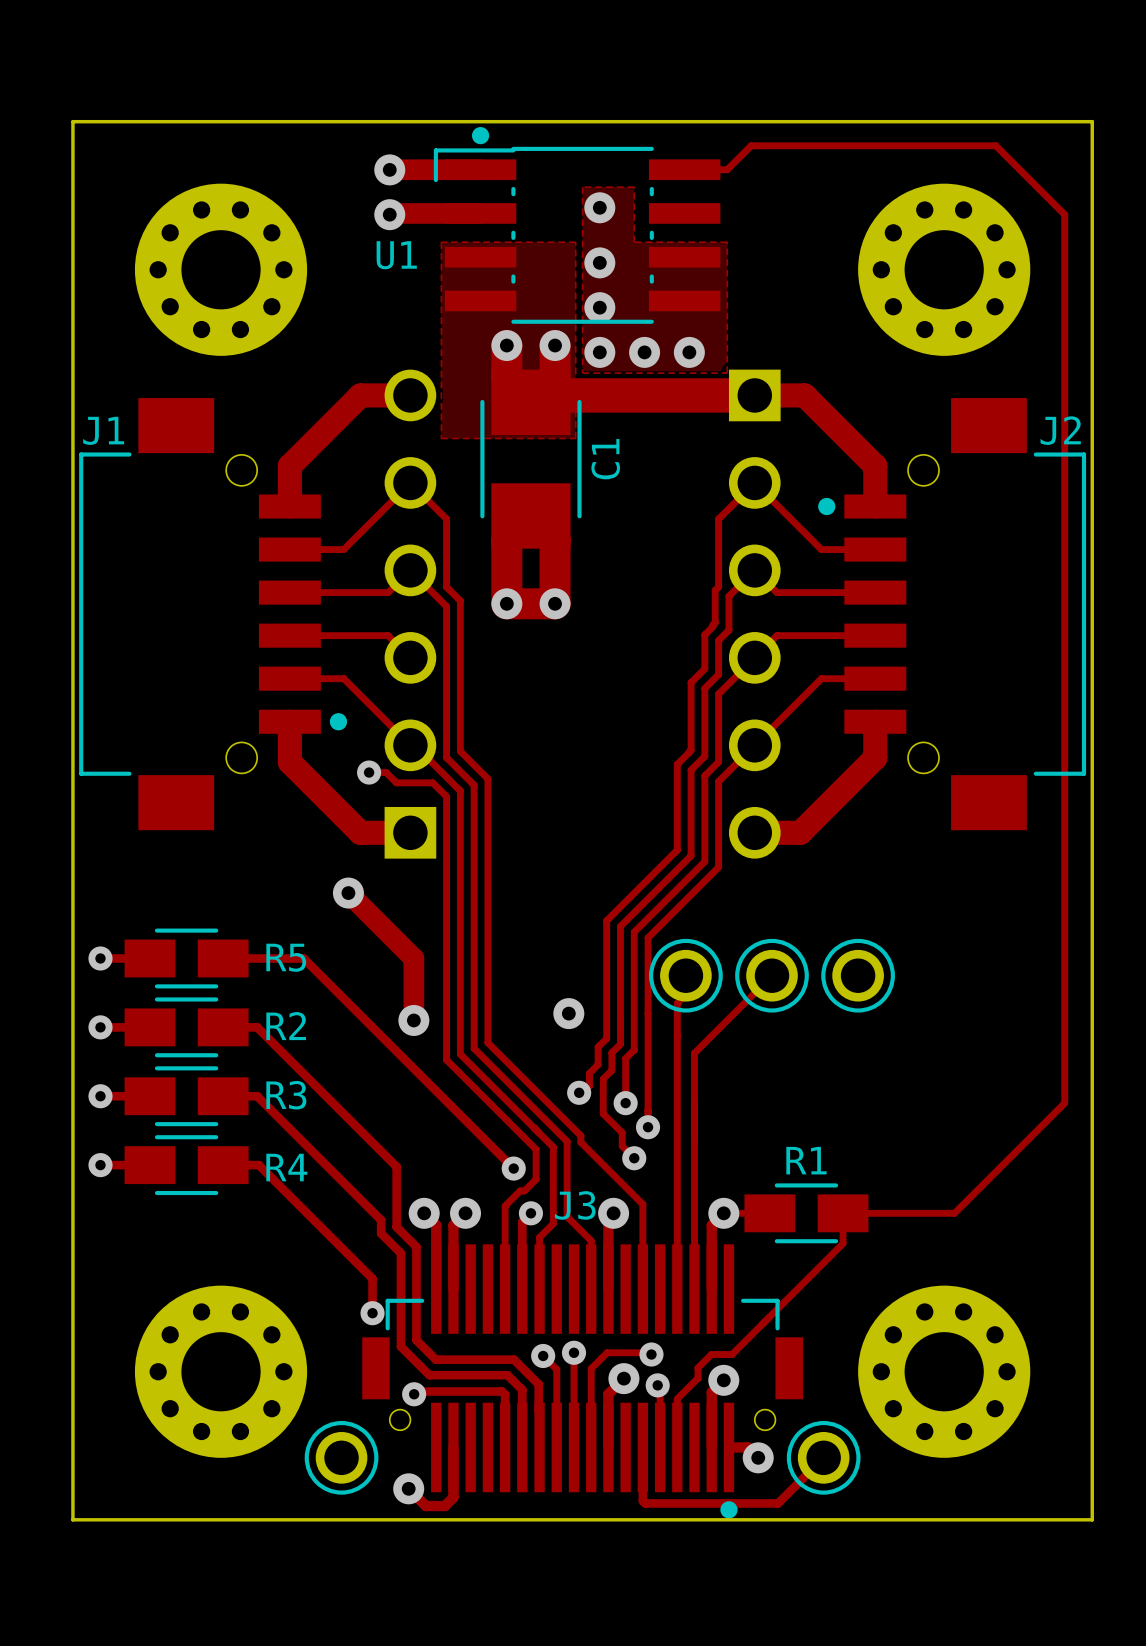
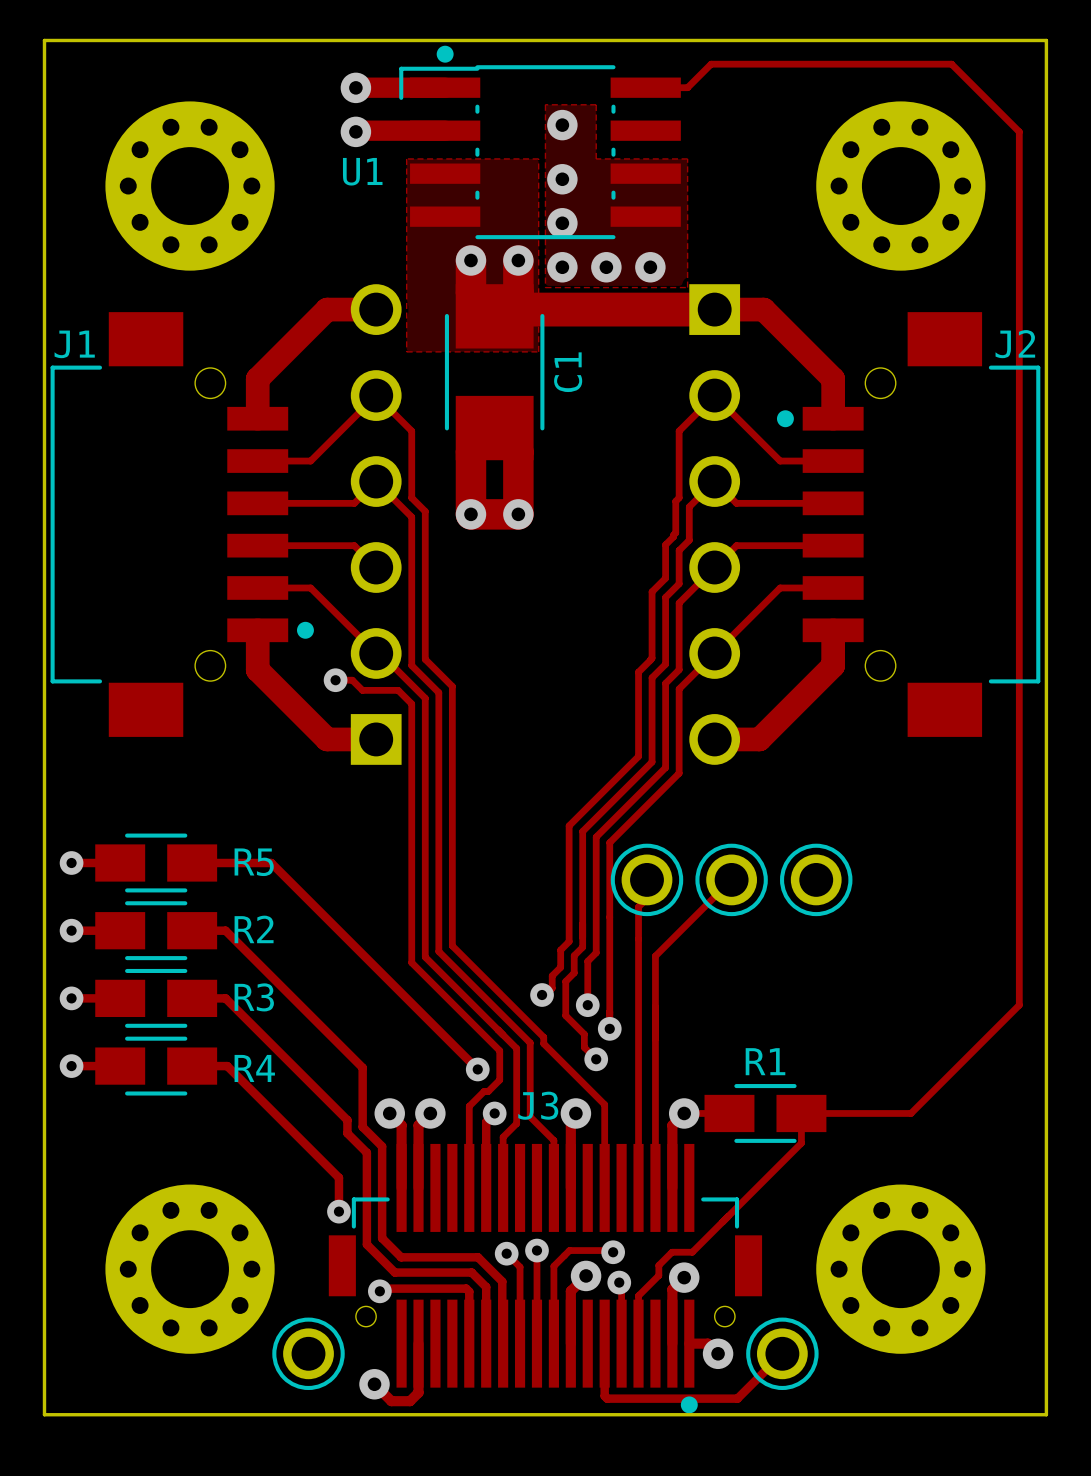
track: (348, 893) (413, 958) (413, 1020) -> none
via: (348, 893) -> none
via: (568, 1013) -> none
via: (413, 1020) -> none

